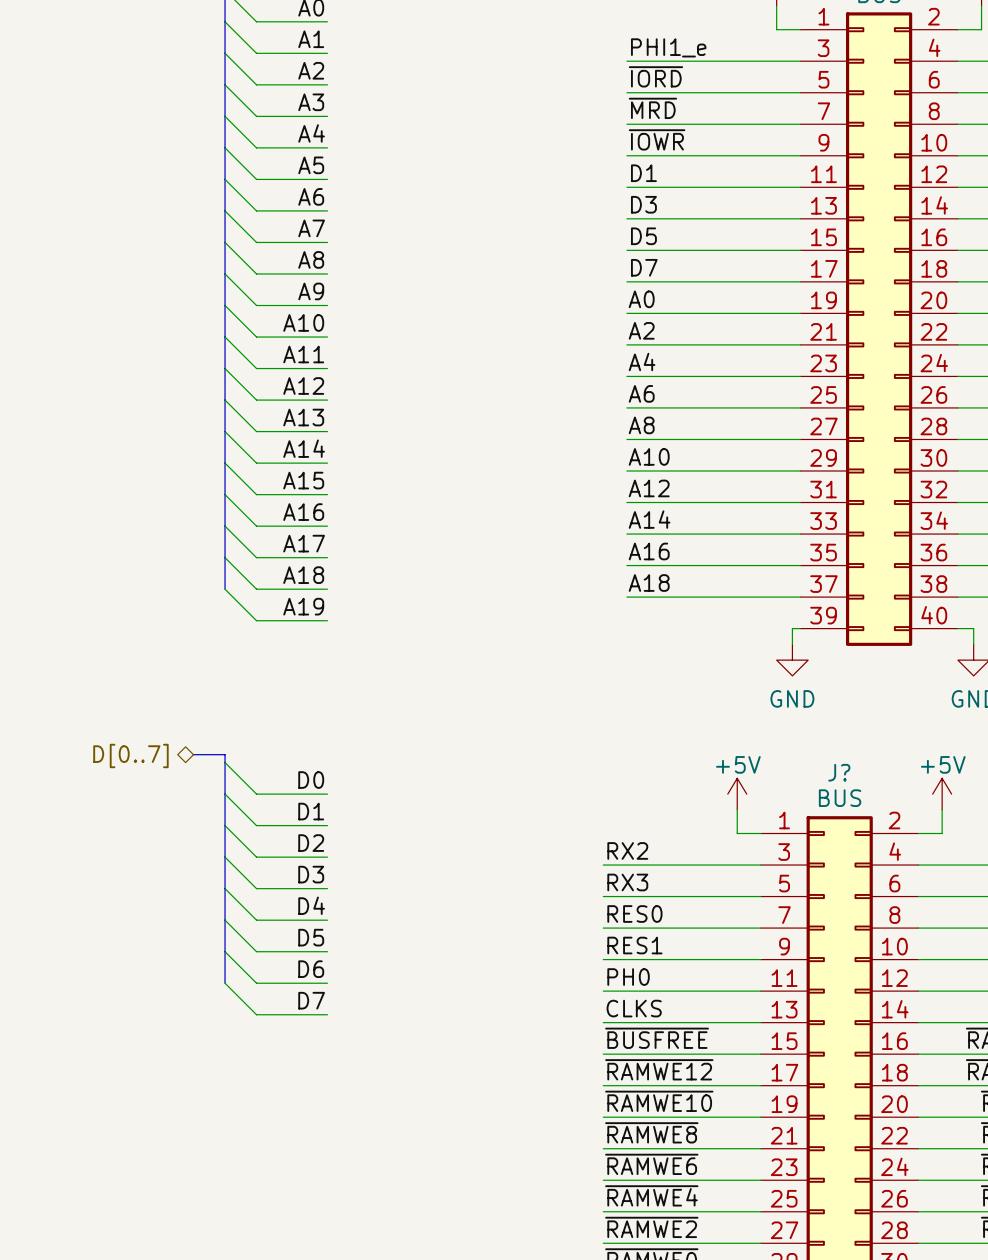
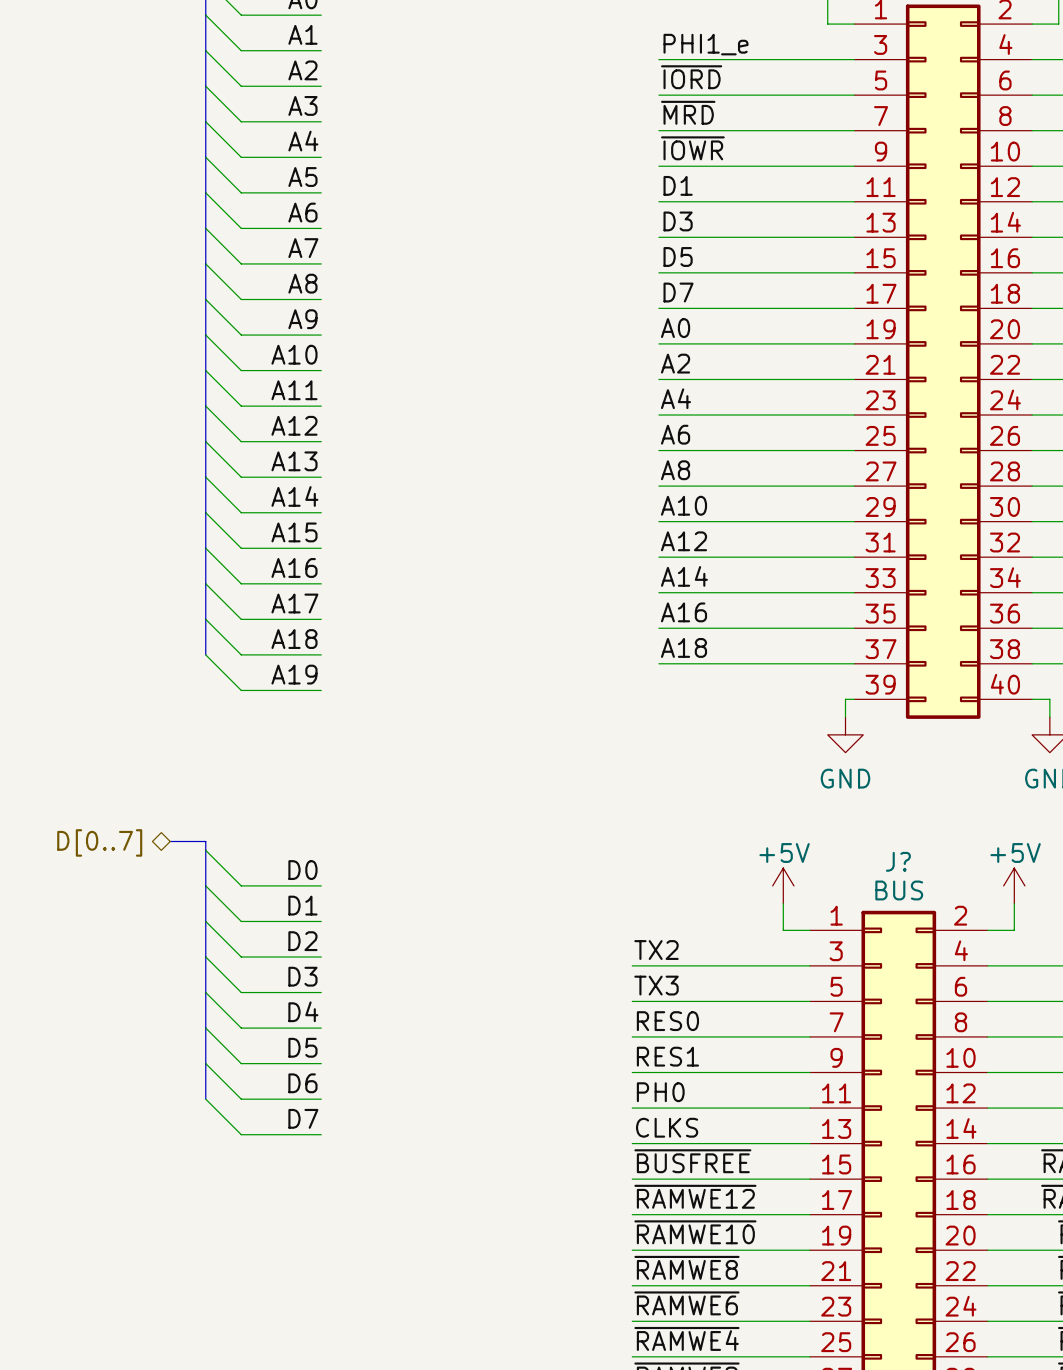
label: RX2 (627, 850) -> TX2 (656, 950)
label: RX3 (627, 882) -> TX3 (656, 985)

